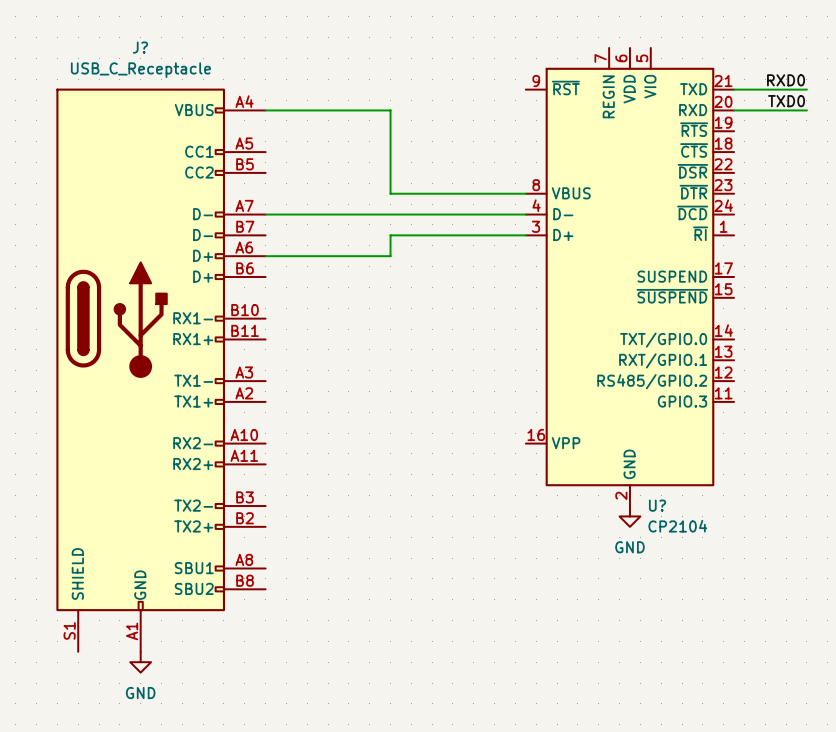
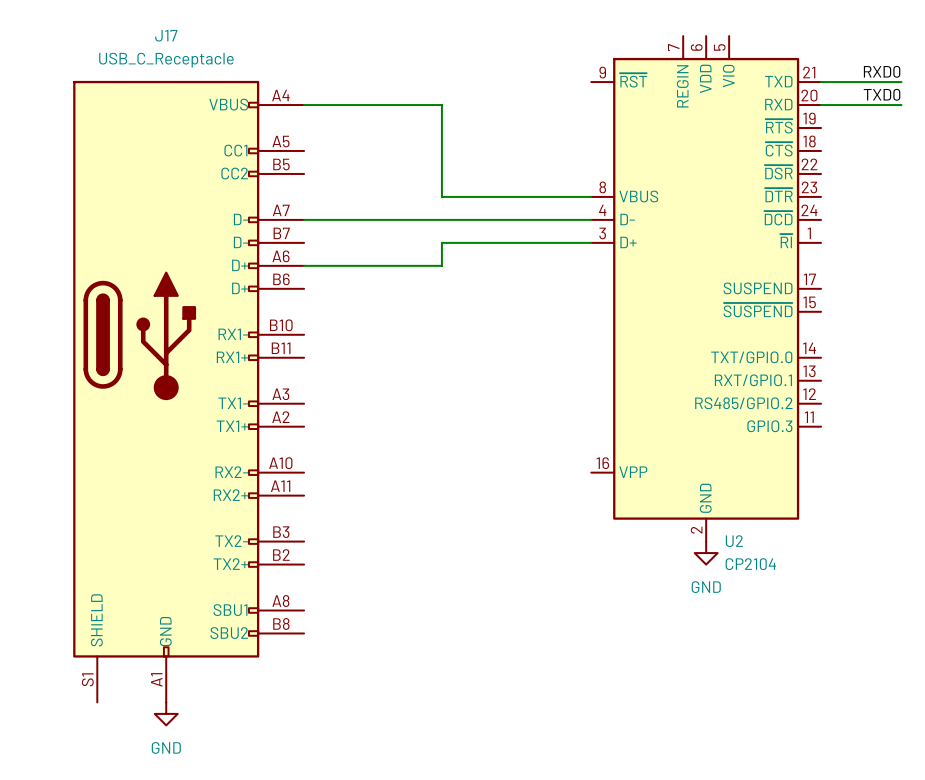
J? name: J? (140, 47) -> J17 (166, 35)
U? name: U? (657, 505) -> U2 (734, 541)

